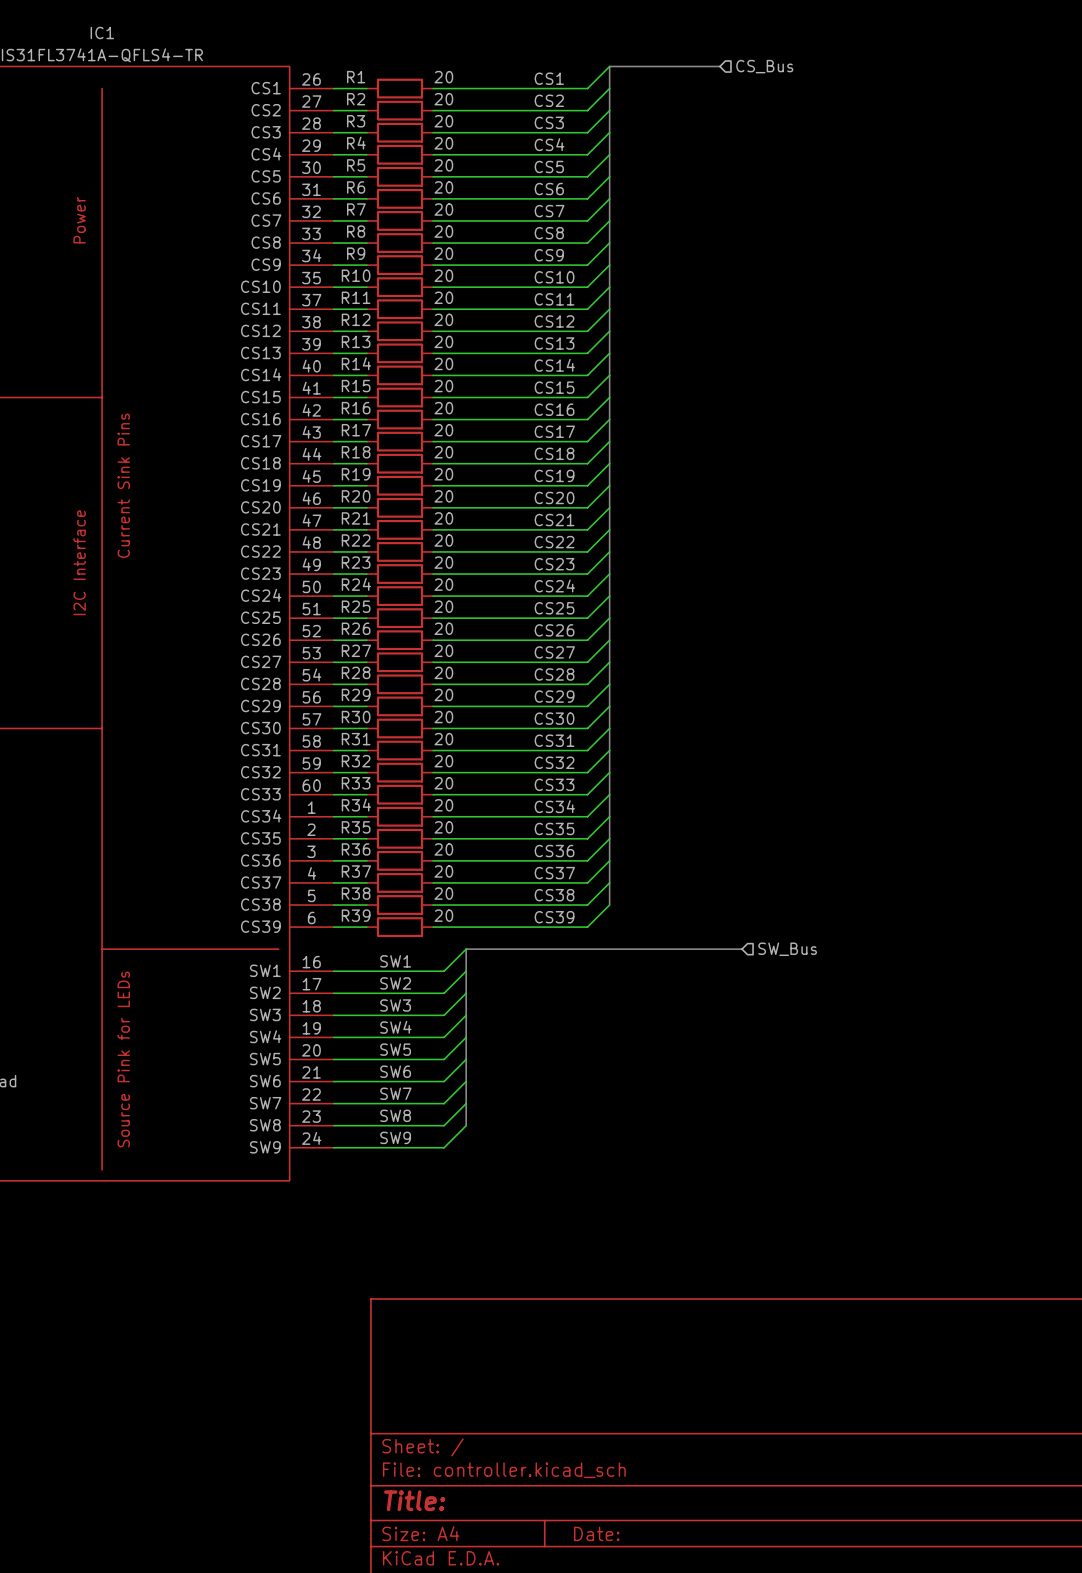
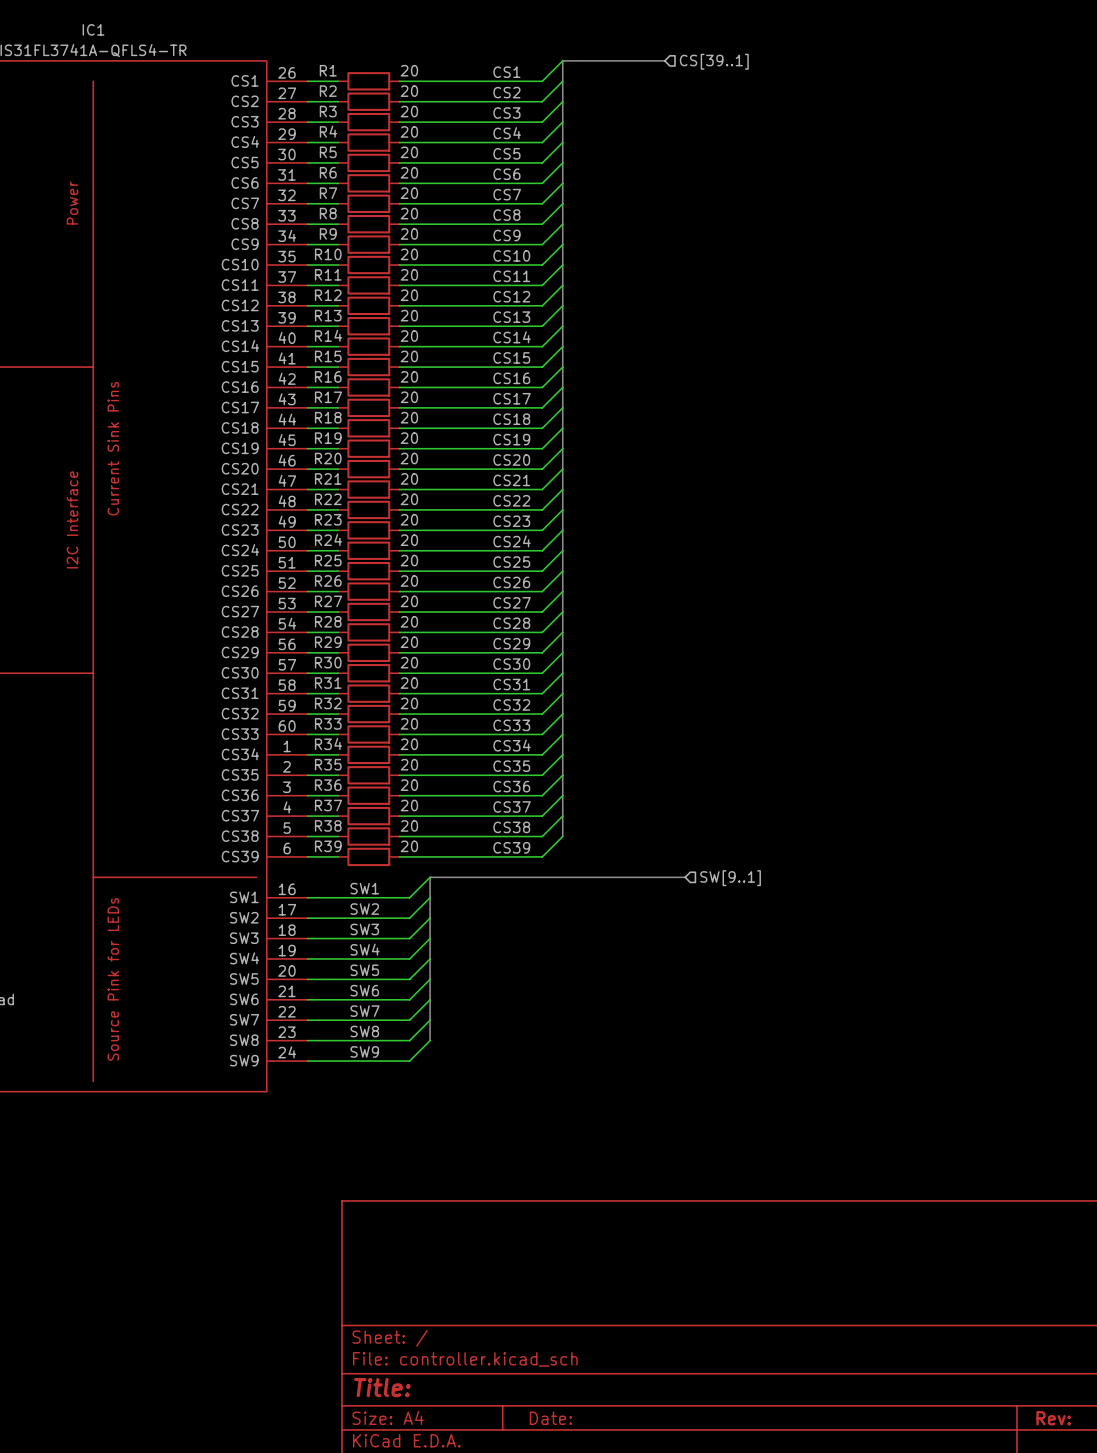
hierarchical label: CS_Bus (764, 66) -> CS[39..1] (714, 61)
hierarchical label: SW_Bus (787, 949) -> SW[9..1] (730, 878)

